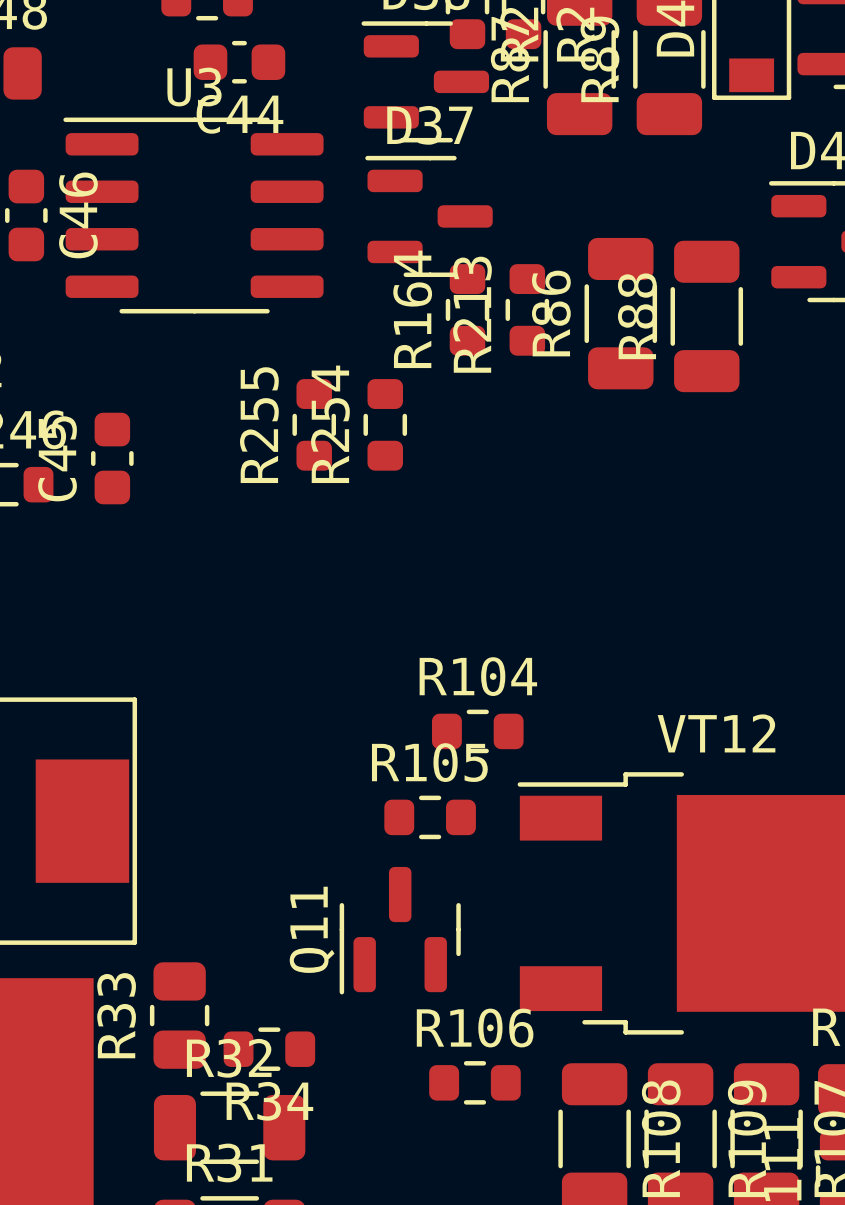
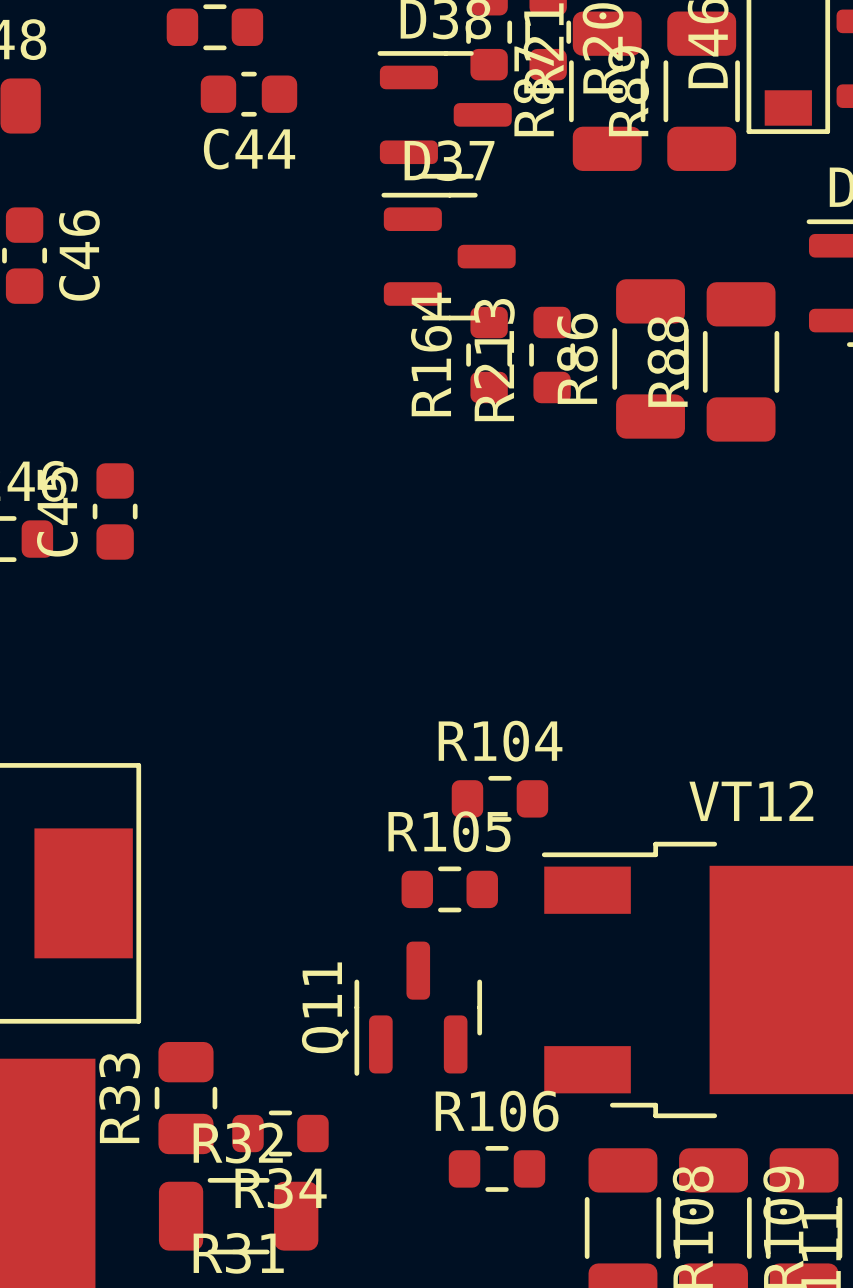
U3: (193, 215) -> none
R255: (314, 424) -> none
R254: (385, 424) -> none

